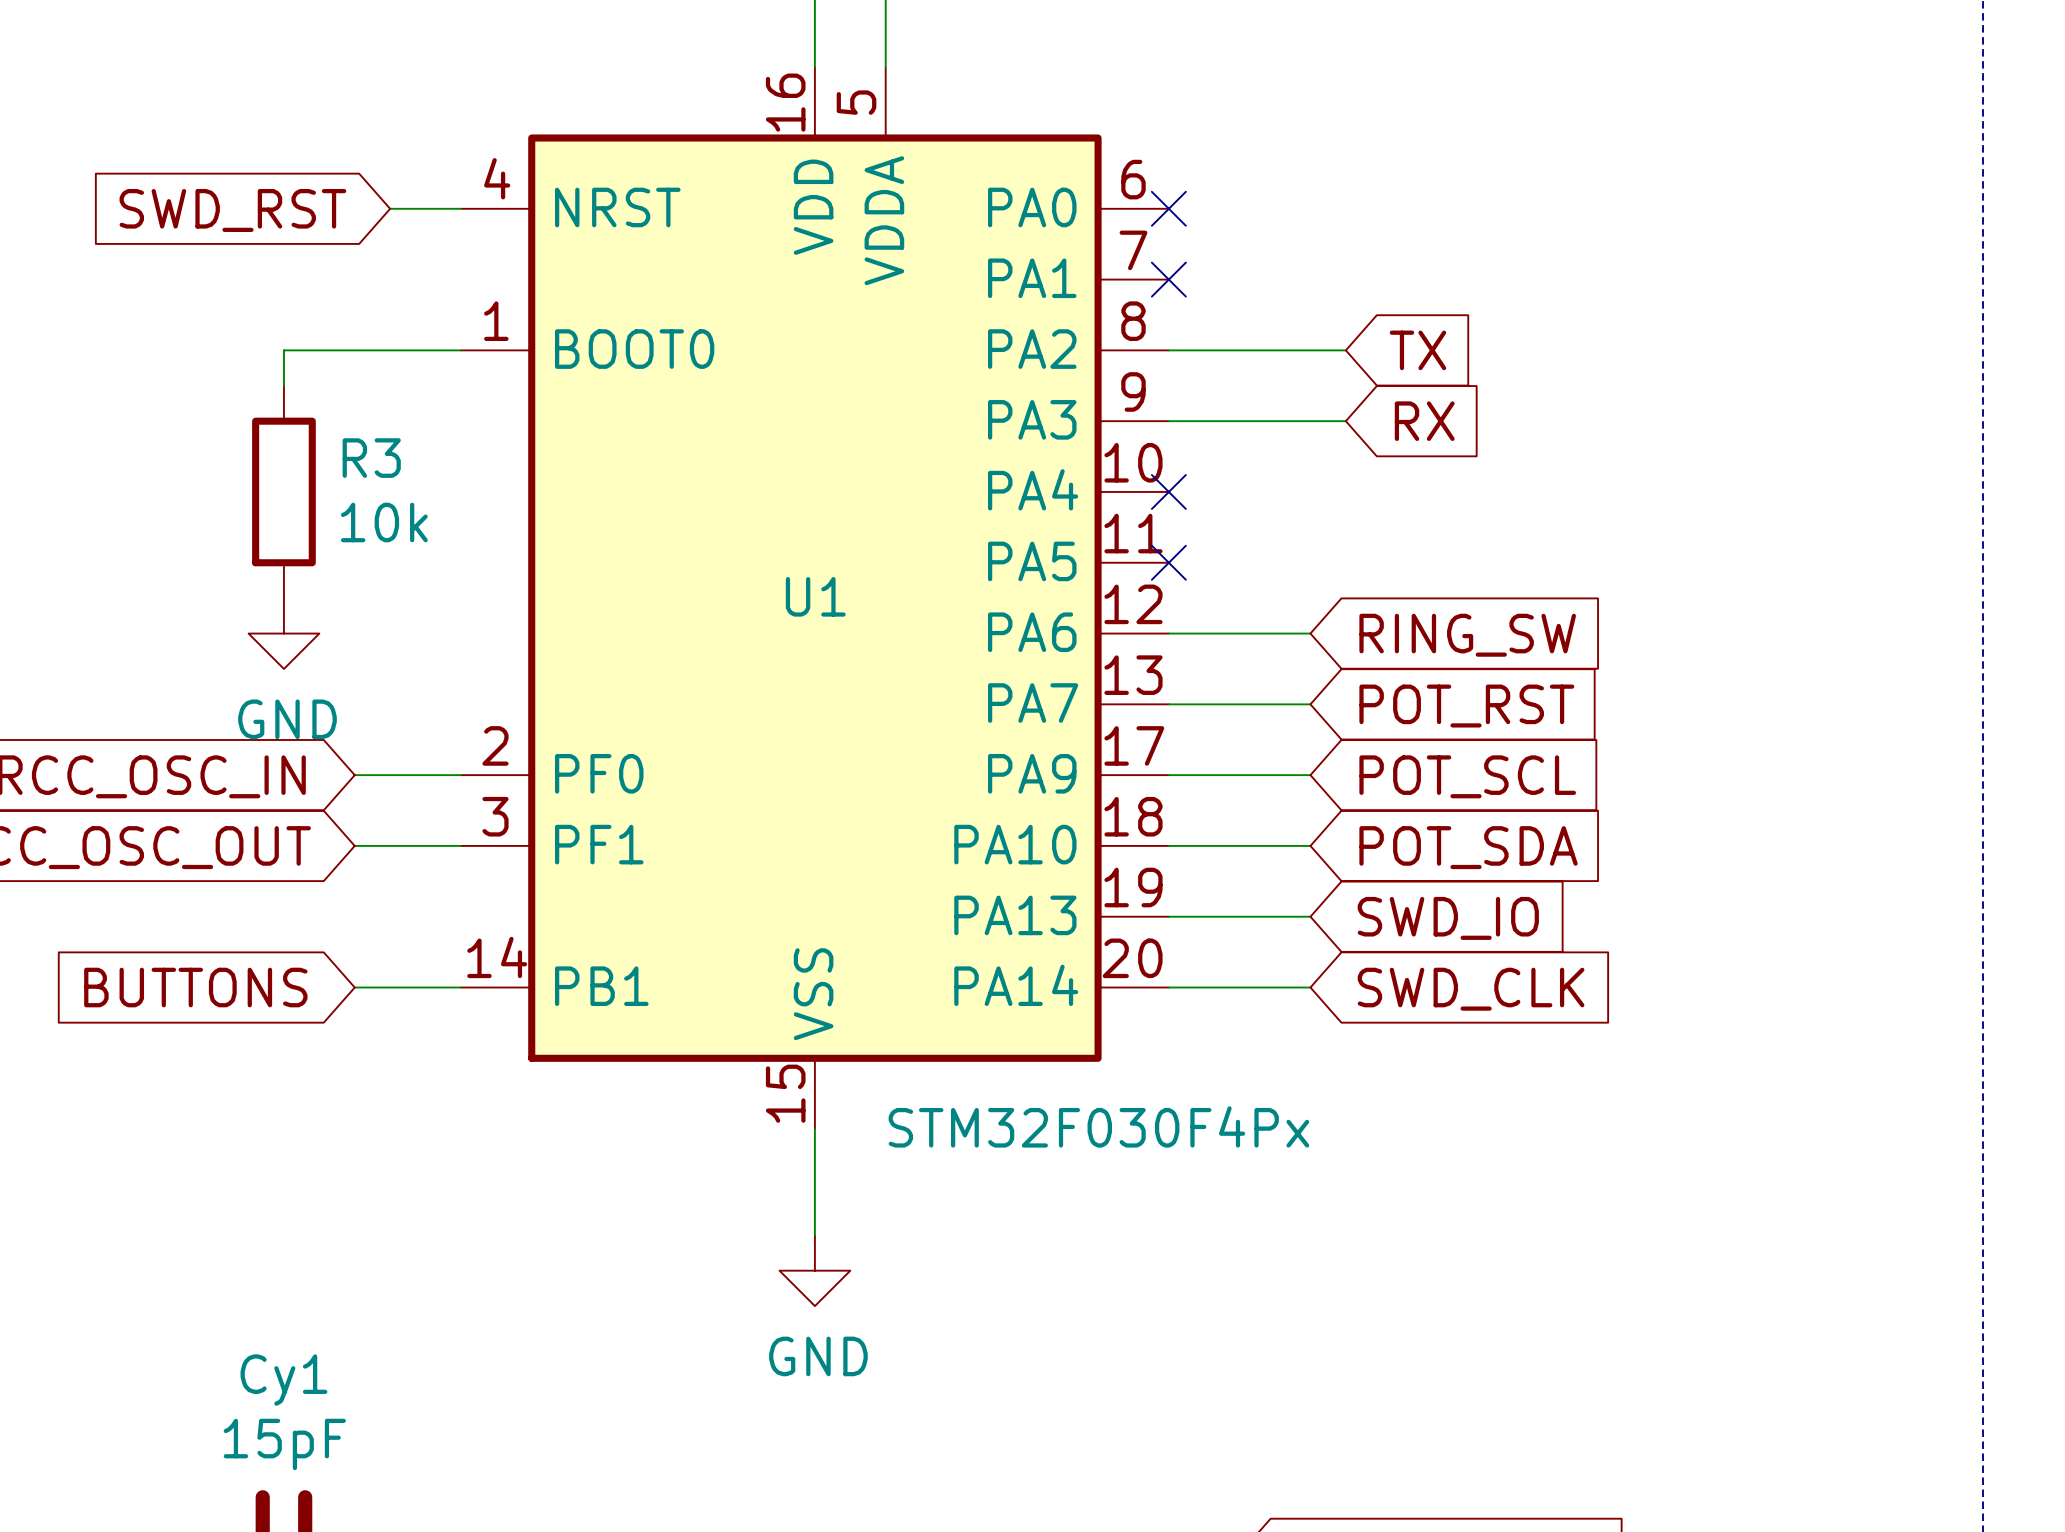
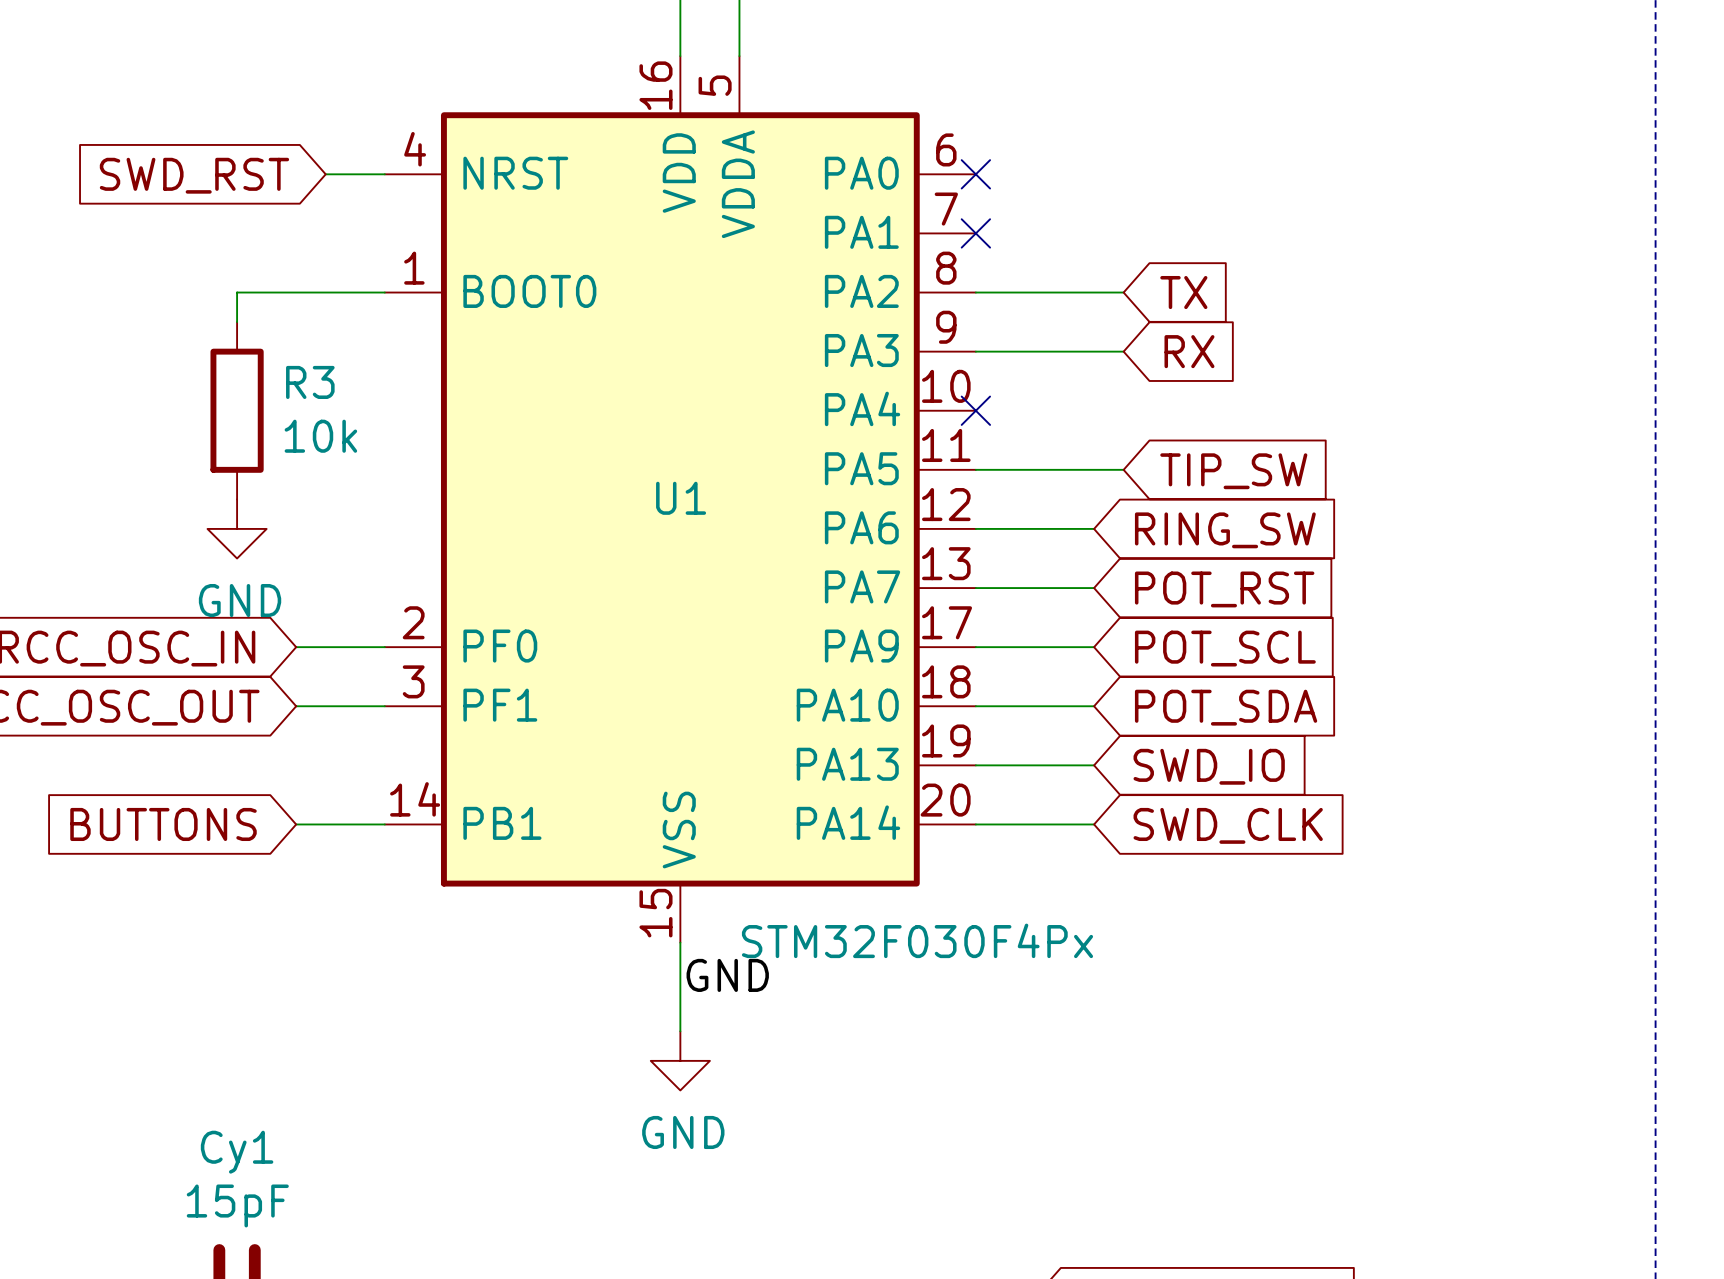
wire: none -> (975, 469) (1123, 469)
no-connect mark: (1168, 562) -> none
global label: none -> TIP_SW (1233, 471)
label: none -> GND (727, 975)

